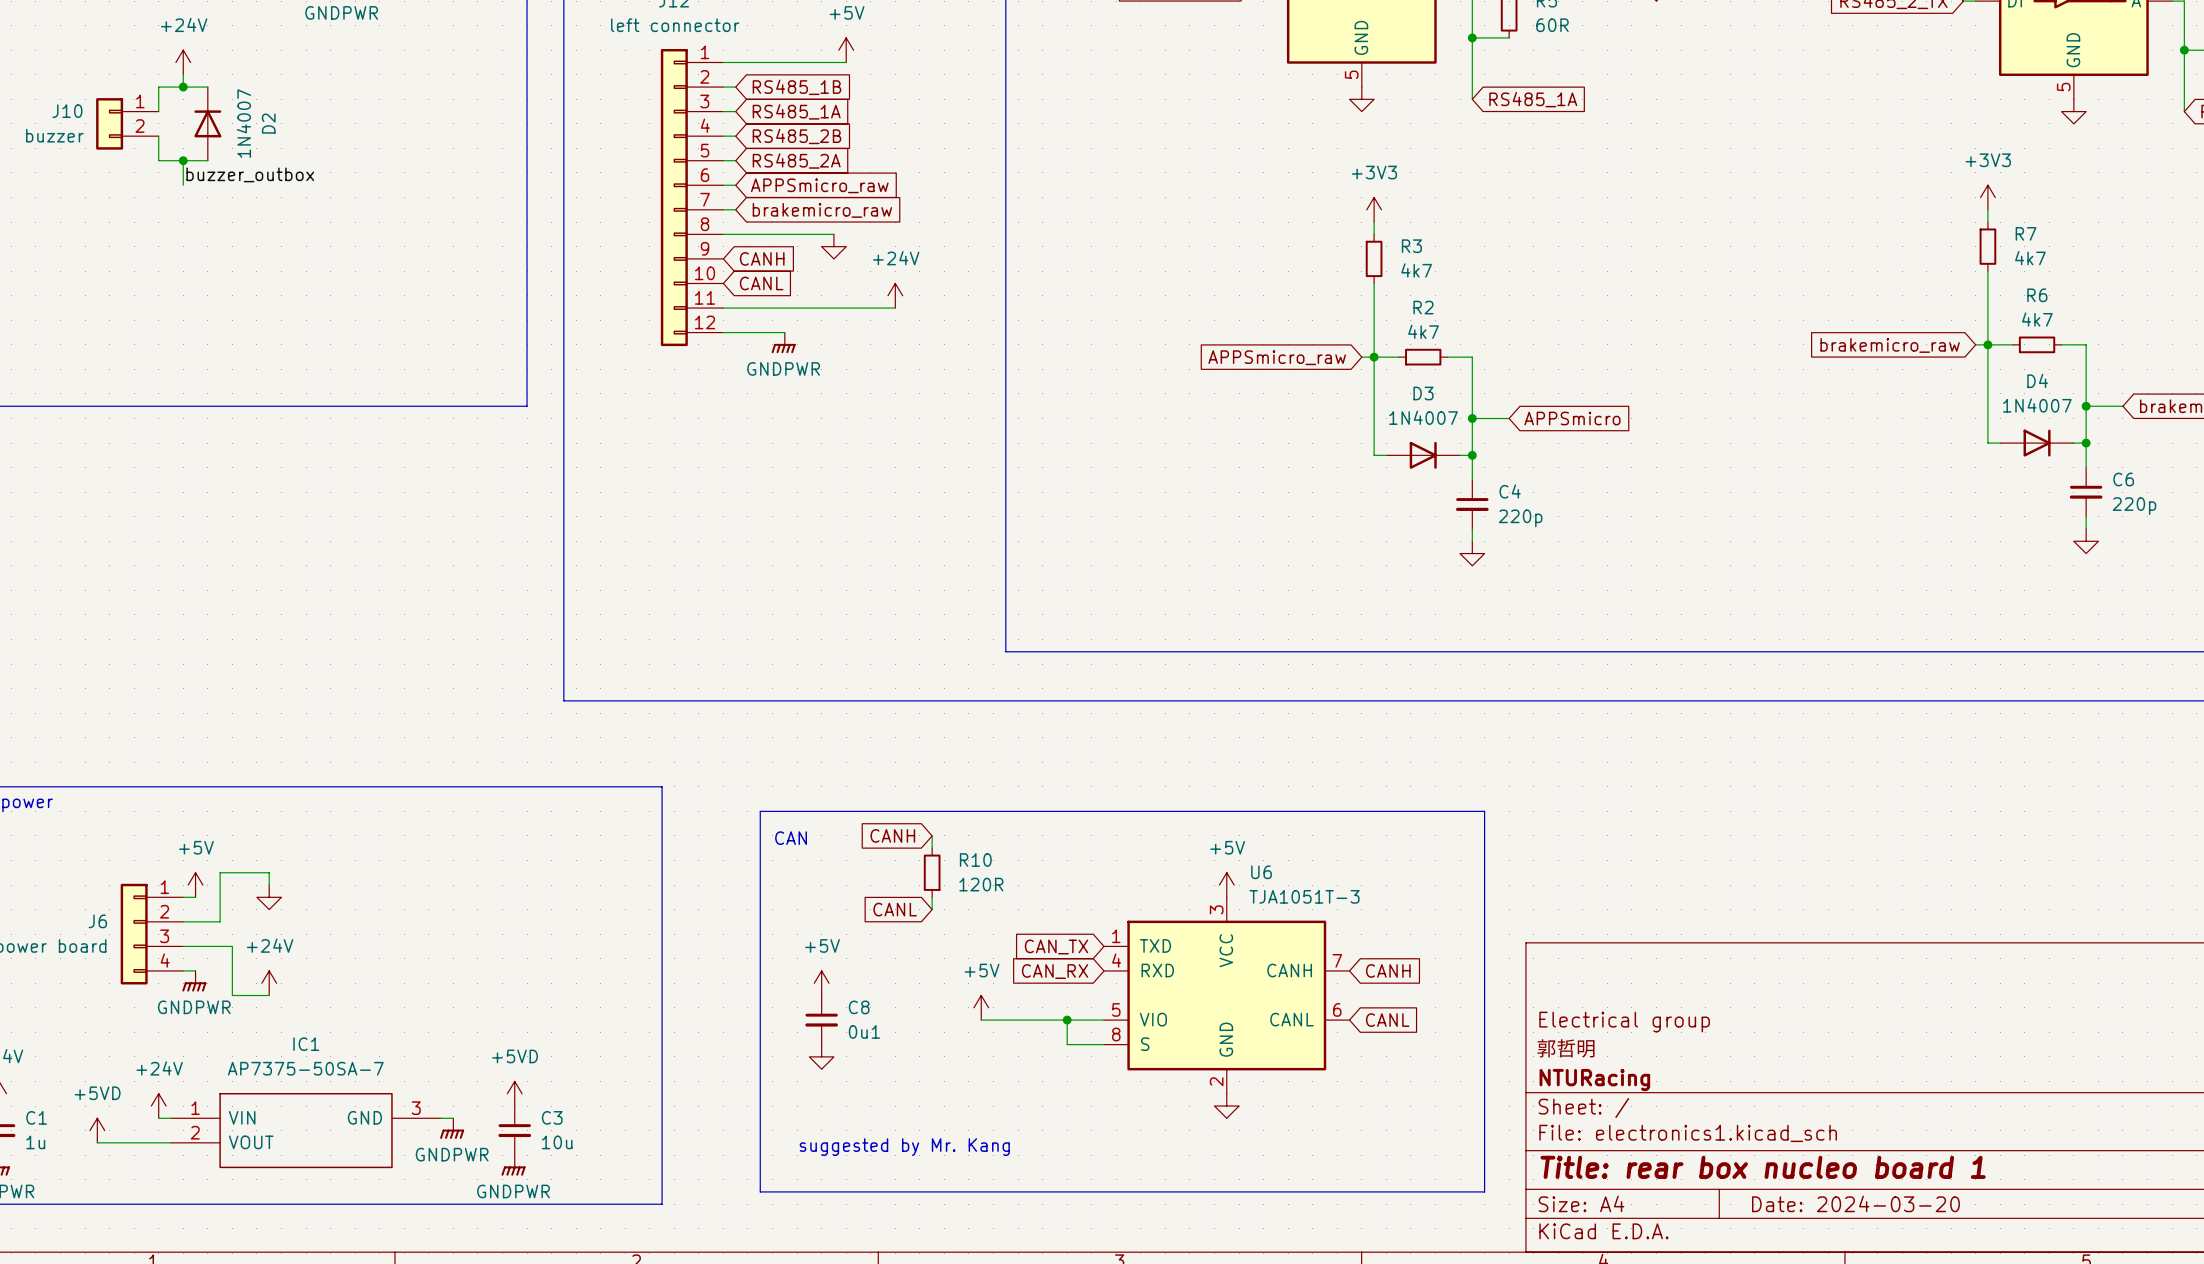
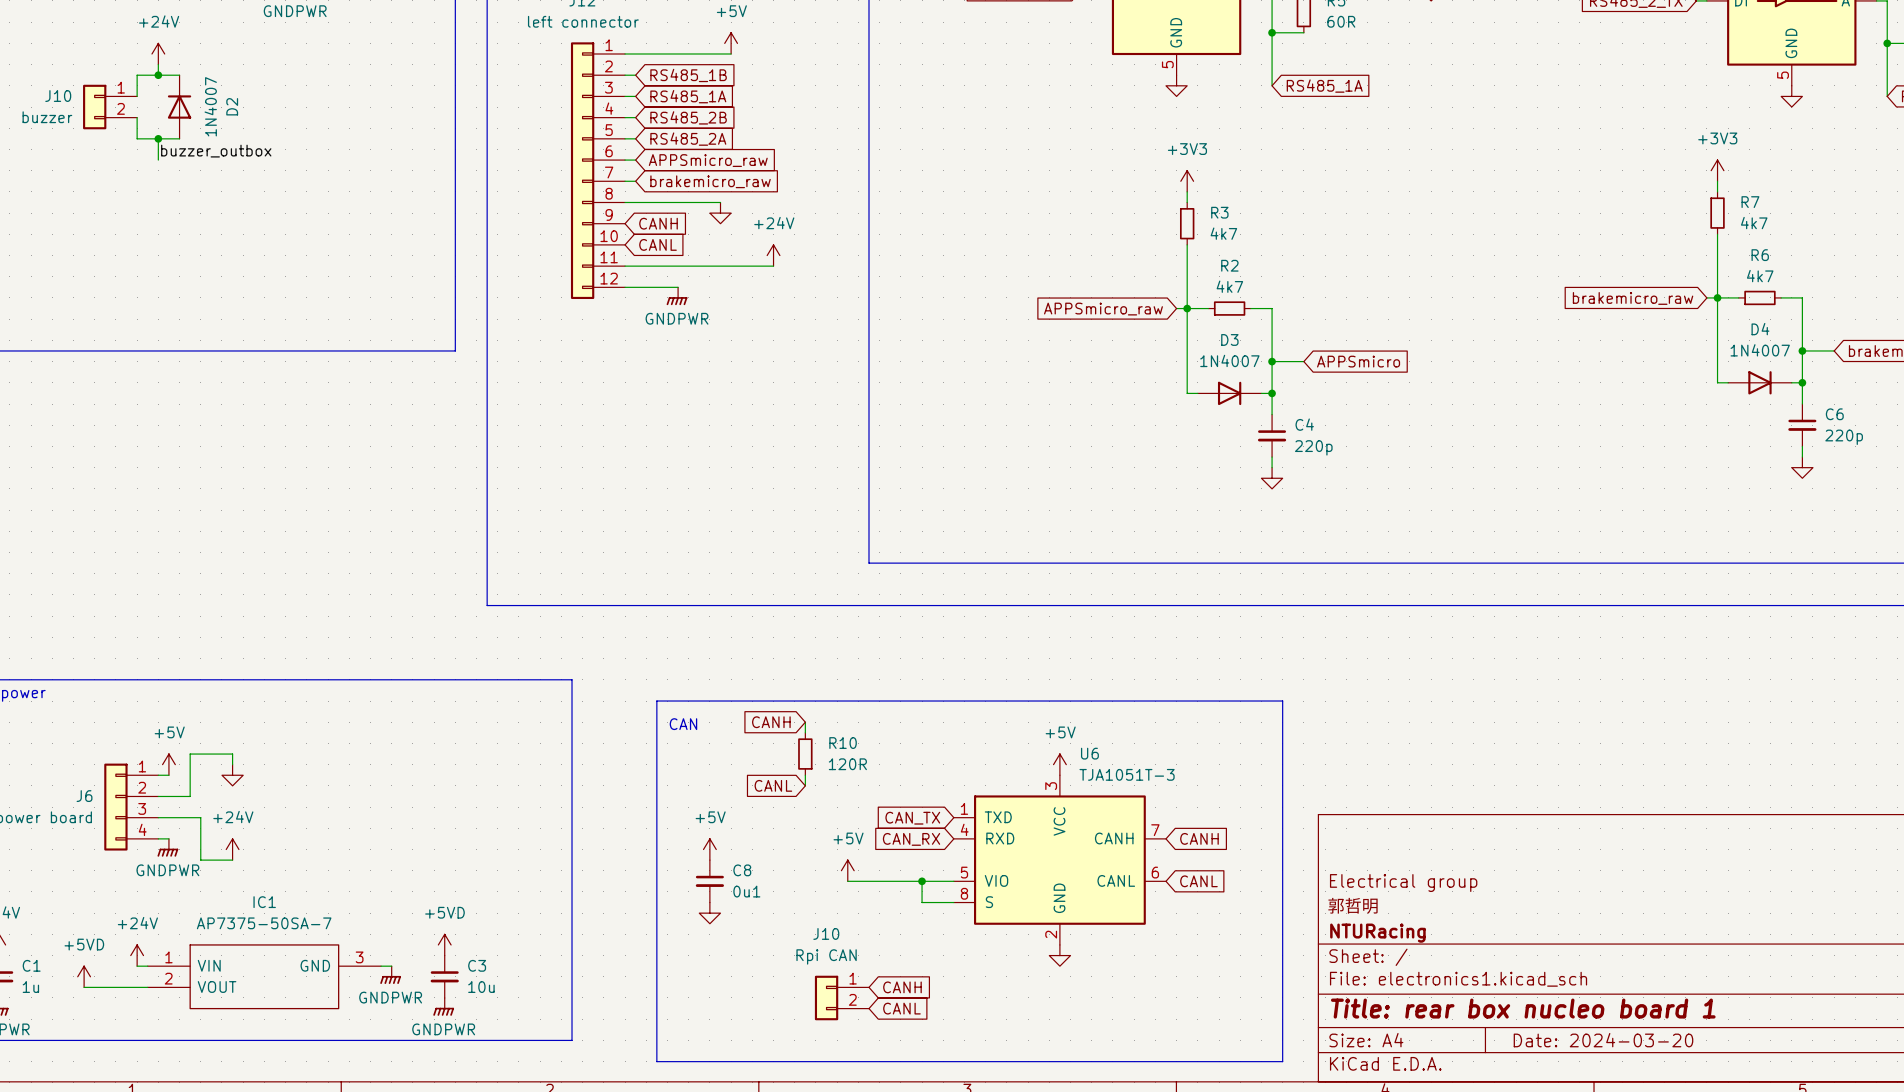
global label: none -> CANH (902, 987)
text: suggested by Mr. Kang (904, 1147) -> none
J10: none -> Rpi CAN (841, 997)
global label: none -> CANL (901, 1008)
line: (760, 1191) (1484, 1191) -> (656, 1029) (656, 1061) (1282, 1061) (1282, 1029)

